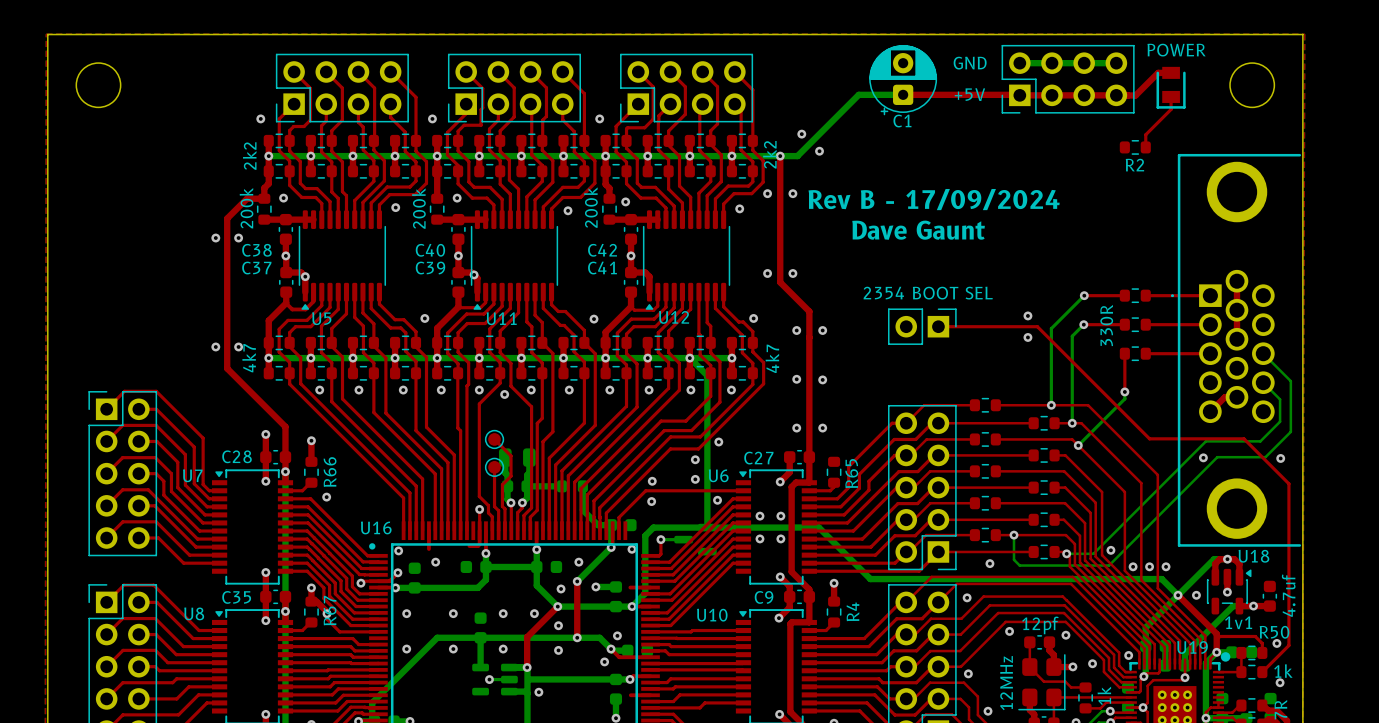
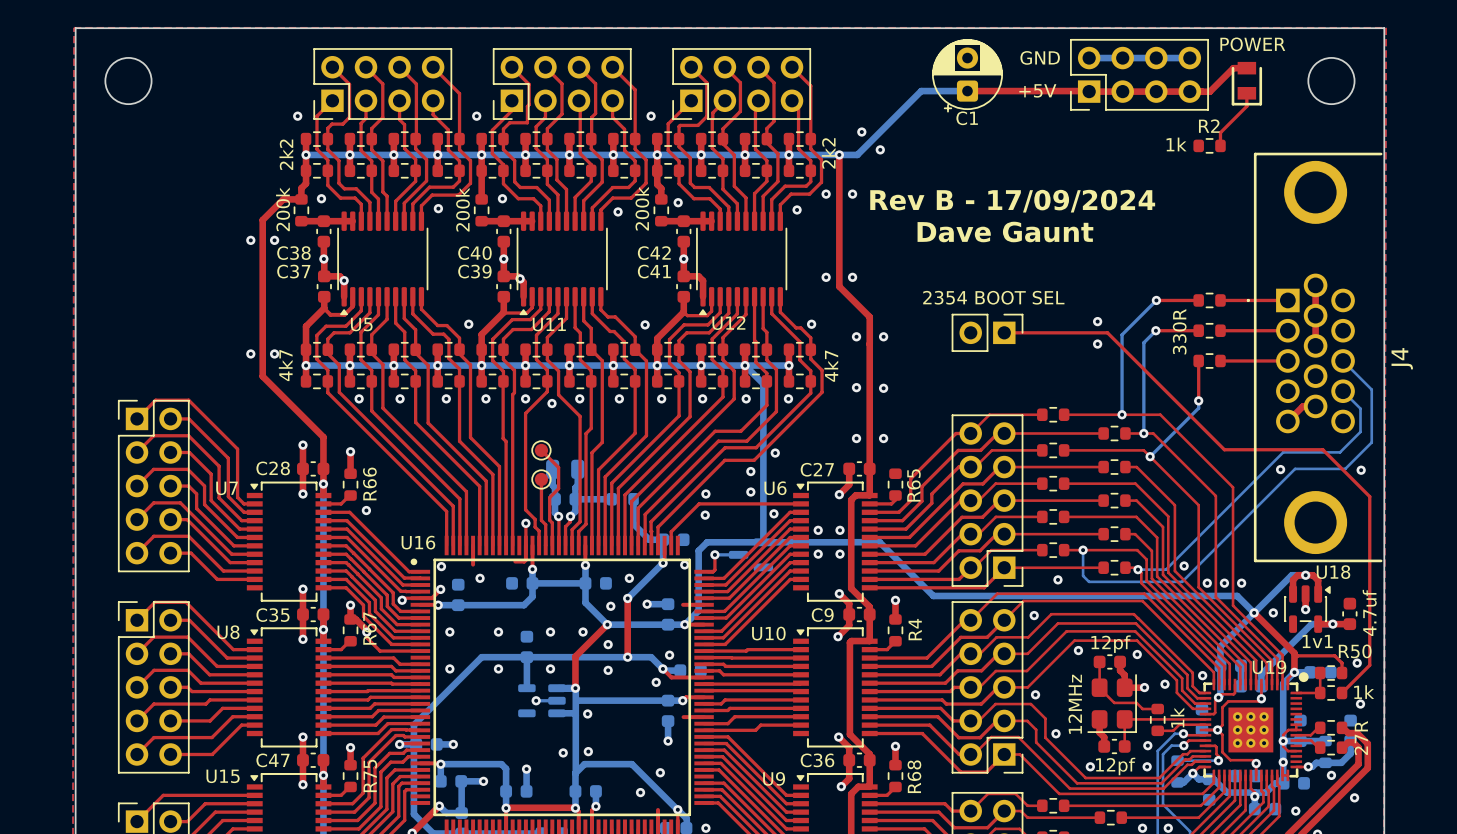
R2 value: none -> 1k (1176, 144)
R2 name position: R2 (1134, 165) -> R2 (1209, 126)
J4 name: none -> J4 (1402, 358)

